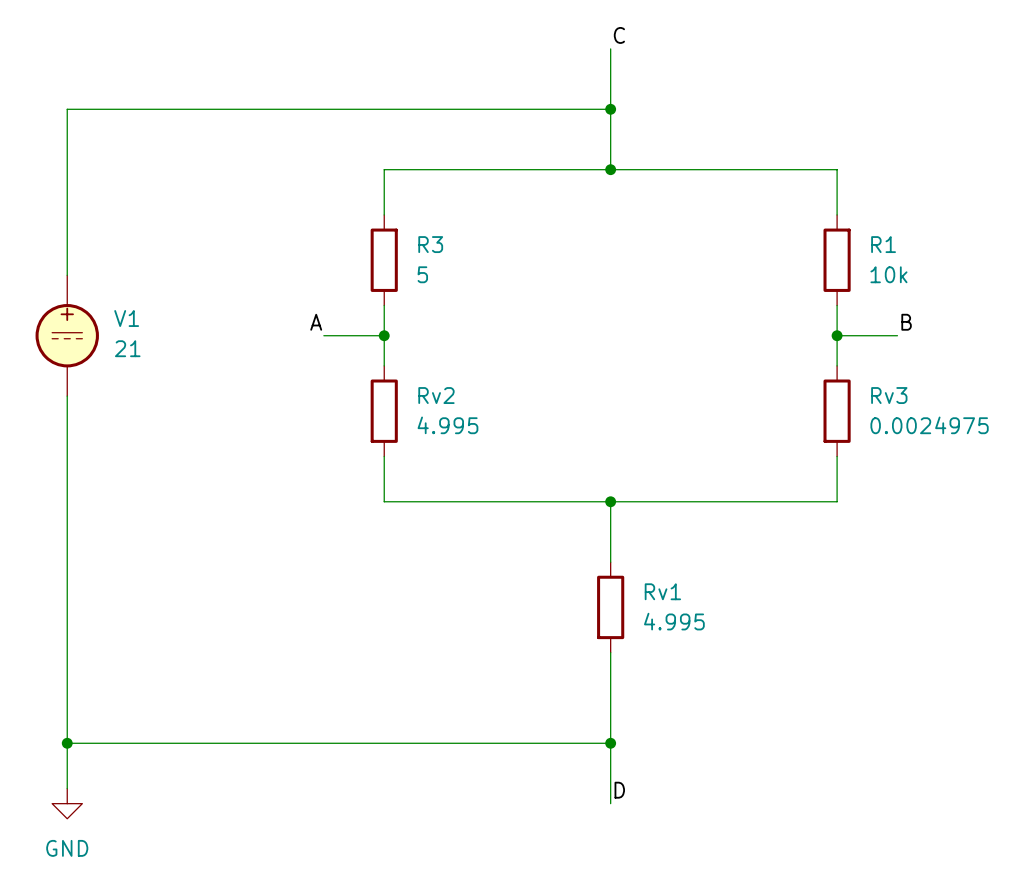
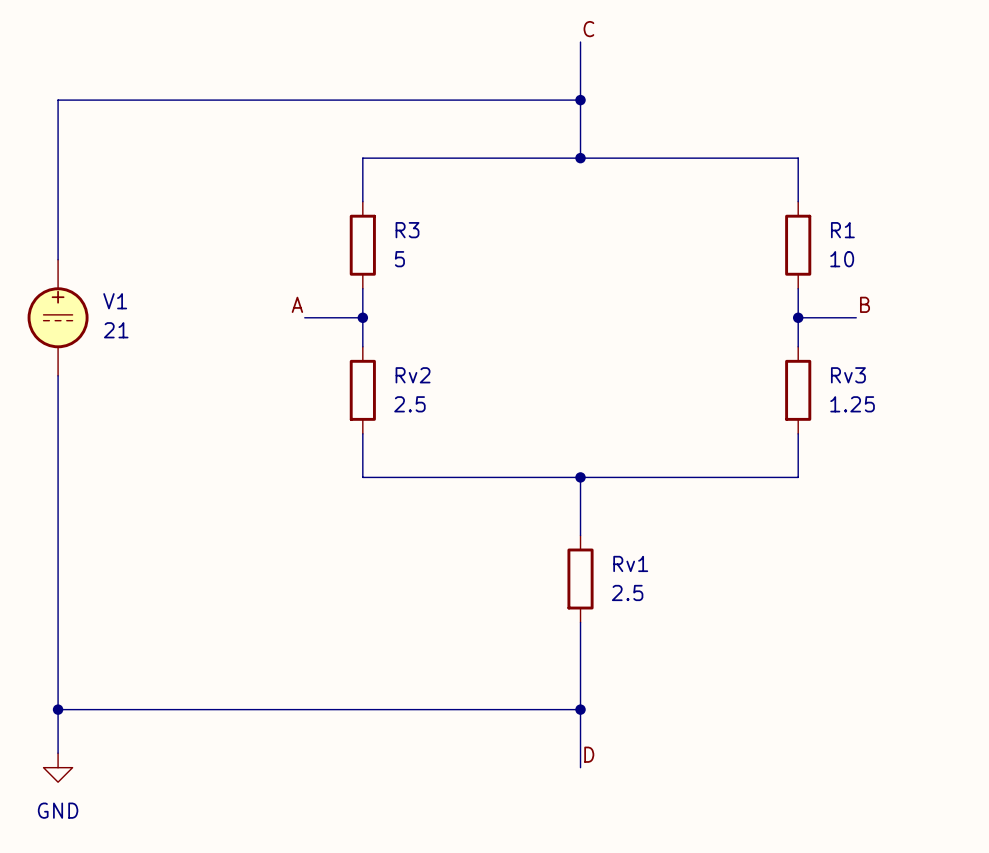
R1 value: 10k (888, 274) -> 10 (842, 259)
Rv2 value: 4.995 (447, 425) -> 2.5 (409, 404)
Rv3 value: 0.0024975 (929, 425) -> 1.25 (852, 404)
Rv1 value: 4.995 (674, 621) -> 2.5 (627, 592)

